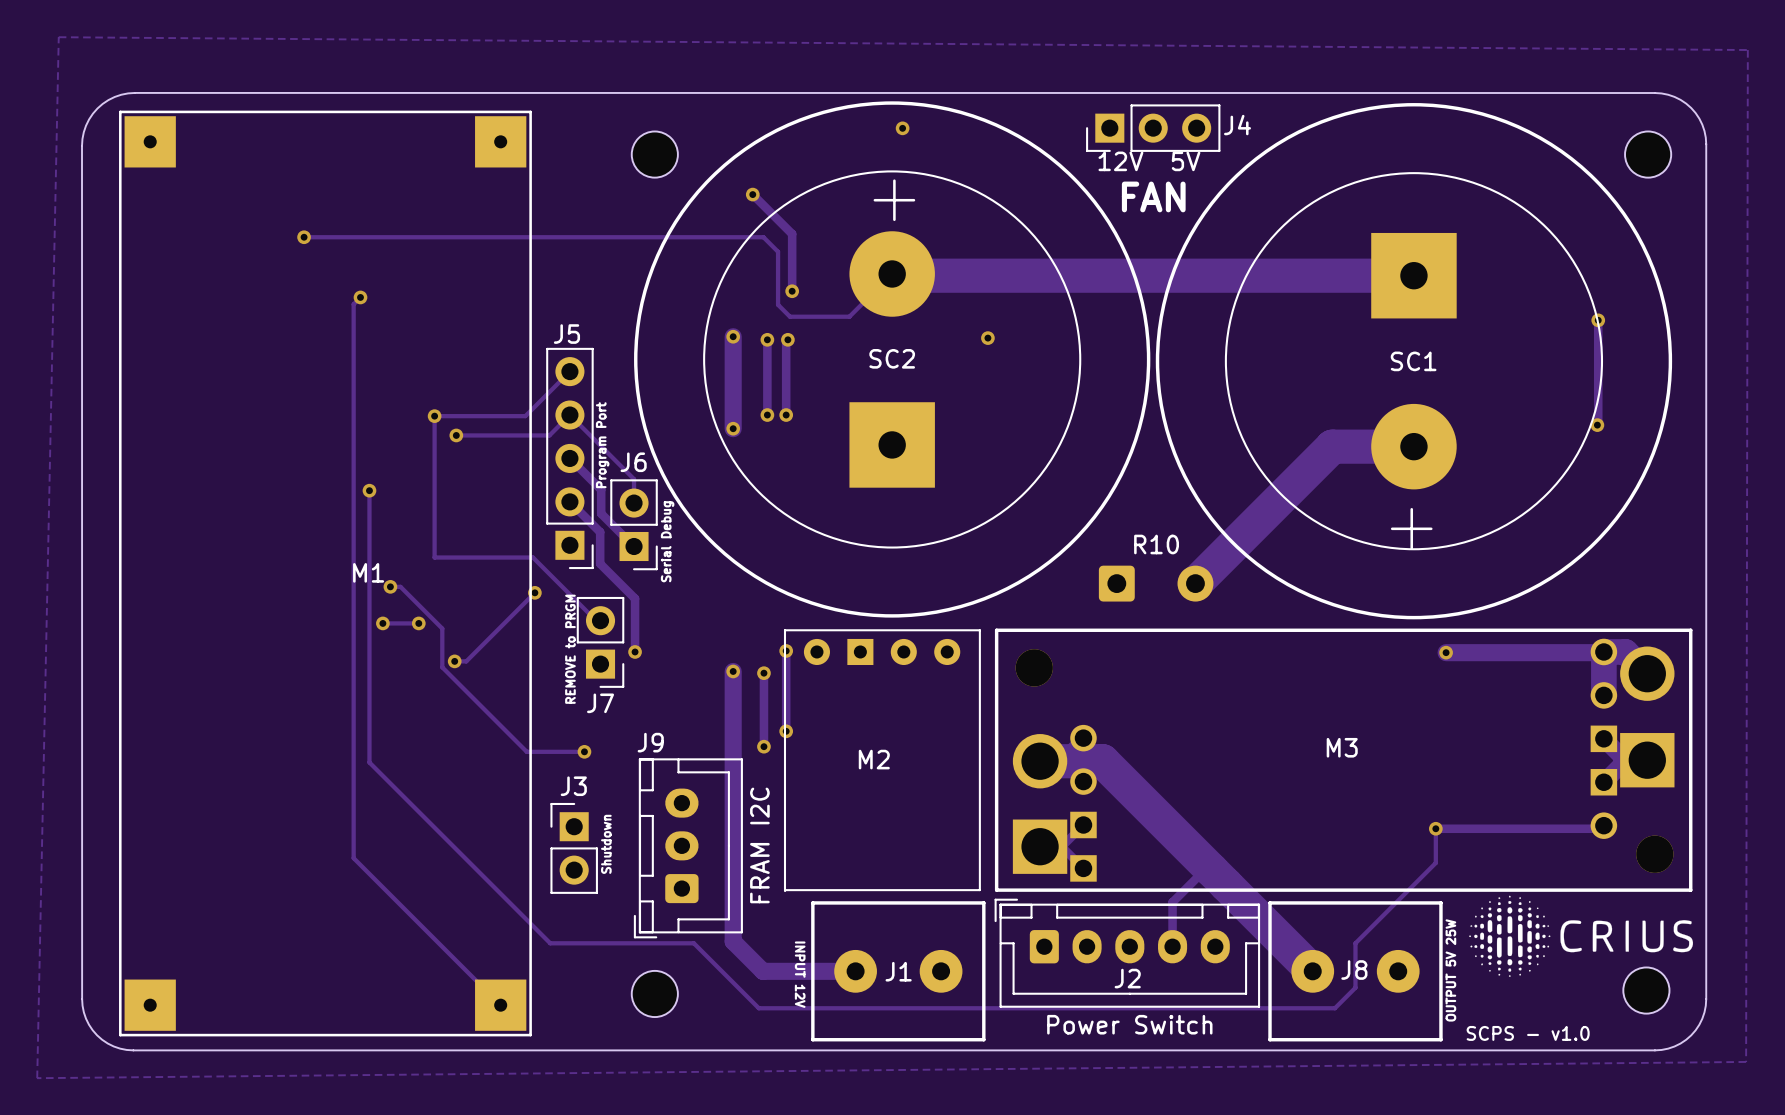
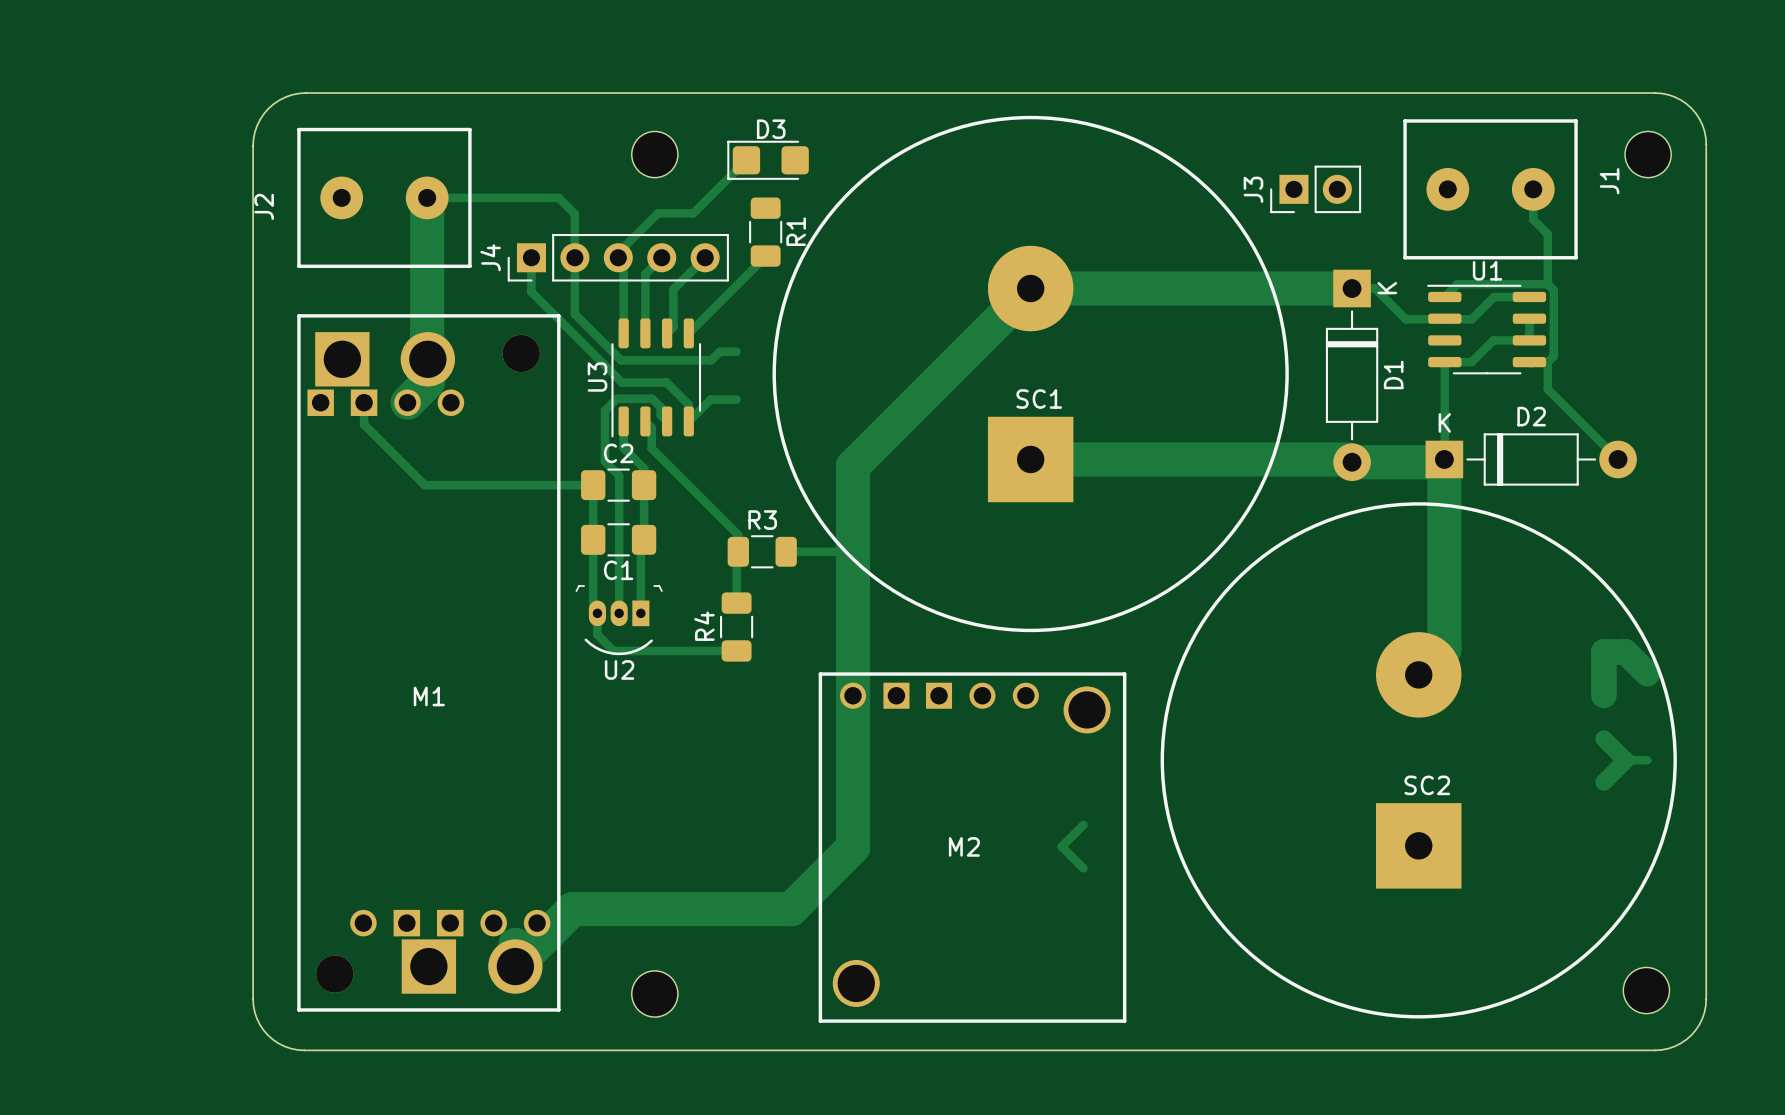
zone outline: (58, 37) (37, 1078) (1746, 1061) (1747, 50) (58, 37) -> none
board edge: (306, 93) (135, 92) (121, 94) (102, 103) (92, 113) (83, 132) (82, 145) (82, 999) (83, 1012) (92, 1030) (102, 1039) (113, 1046) (126, 1049) (304, 1050) -> (306, 93) (285, 97) (268, 108) (257, 125) (253, 146) (253, 999) (256, 1018) (268, 1035) (284, 1046) (304, 1050)
SC2 footprint: [634, 101, 1151, 618] -> [1160, 502, 1677, 1019]
SC1 footprint: [1155, 103, 1673, 620] -> [772, 115, 1289, 633]
J4 footprint: [1086, 104, 1221, 152] -> [507, 233, 729, 282]
M1 footprint: [119, 110, 532, 1037] -> [297, 314, 561, 1012]
J4 name position: J4 (1237, 125) -> J4 (490, 257)
via: (902, 128) -> none
track: none -> (746, 160) (693, 213) (657, 213) (618, 252) (618, 257) (623, 263) (623, 333)
D3: none -> (768, 160)
J4 value: 12V 5V (1149, 161) -> none
track: none -> (1533, 189) (1533, 219) (1547, 234) (1547, 284)
track: (752, 194) (792, 233) (792, 291) -> none
via: (752, 194) -> none
text: FAN (1153, 196) -> none
R1: none -> (765, 232)
track: (304, 237) (763, 237) (778, 251) (778, 304) (790, 316) (849, 316) (892, 273) (893, 275) (1413, 275) -> none
via: (304, 237) -> none
track: none -> (765, 256) (688, 333)
track: none -> (531, 257) (531, 291) (622, 382) (666, 382) (688, 404) (688, 421) (710, 399) (736, 399)
track: none -> (661, 257) (645, 274) (645, 333)
track: none -> (705, 257) (673, 289) (673, 327) (667, 333)
track: none -> (1547, 284) (1553, 290) (1553, 356) (1547, 362)
track: none -> (1547, 284) (1457, 284) (1444, 296)
via: (792, 291) -> none
track: none -> (1529, 296) (1494, 296) (1471, 319) (1405, 319) (1375, 288) (1030, 288) (853, 466) (853, 847) (791, 909) (572, 909) (515, 966) (515, 944)
track: (360, 297) (353, 304) (353, 858) (500, 1005) -> none
via: (360, 297) -> none
track: none -> (1529, 318) (1529, 340) (1493, 340) (1471, 362) (1444, 362) (1444, 459)
track: (1598, 320) (1597, 425) -> none
via: (1598, 320) -> none
U1: none -> (1486, 329)
track: (733, 336) (733, 428) -> none
via: (733, 336) -> none
via: (987, 338) -> none
track: (767, 339) (767, 415) -> none
via: (767, 339) -> none
track: (787, 339) (786, 341) (786, 415) -> none
via: (787, 339) -> none
track: none -> (736, 351) (719, 351) (711, 360) (621, 360) (574, 314) (574, 213) (558, 197) (427, 197) (427, 382) (407, 402)
track: none -> (1547, 362) (1547, 389) (1618, 459)
track: (569, 371) (525, 416) (434, 416) (434, 557) (532, 557) (596, 620) (600, 620) -> none
D1: none -> (1352, 375)
U3: none -> (656, 377)
track: none -> (364, 402) (364, 424) (424, 485) (593, 485) (593, 609) (597, 613) (597, 634) (613, 650) (736, 650)
via: (767, 415) -> none
via: (786, 415) -> none
via: (434, 416) -> none
track: none -> (623, 421) (623, 448) (644, 468) (644, 539) (640, 543) (640, 613)
track: none -> (645, 421) (651, 427) (651, 448) (738, 535) (736, 603)
track: none -> (667, 421) (660, 415) (660, 407) (652, 398) (616, 398) (604, 410) (604, 461) (619, 475) (619, 613)
via: (1597, 425) -> none
via: (733, 428) -> none
track: (456, 435) (549, 435) (569, 415) (634, 479) (634, 503) -> none
via: (456, 435) -> none
text: Program Port (602, 445) -> none
track: (1413, 446) (1332, 446) (1195, 583) -> none
track: (569, 458) (601, 489) (601, 513) (634, 546) -> none
J5: (569, 458) -> none
track: none -> (1030, 459) (1349, 459) (1352, 462) (1441, 462) (1444, 459)
track: none -> (1444, 459) (1444, 649) (1418, 674)
D2: none -> (1531, 459)
C2: none -> (618, 485)
track: (369, 490) (369, 762) (550, 943) (693, 943) (758, 1008) (1334, 1008) (1355, 987) (1355, 943) (1435, 862) (1435, 828) (1600, 828) (1603, 825) -> none
via: (369, 490) -> none
track: (569, 501) (600, 532) (600, 563) (635, 598) (635, 651) -> none
J6: Serial Debug (634, 524) -> none
C1: none -> (618, 539)
R3: none -> (762, 551)
track: none -> (786, 551) (853, 551)
M1 name position: M1 (368, 572) -> M1 (429, 696)
R10: (1156, 583) -> none
track: (390, 586) (400, 586) (442, 628) (442, 667) (526, 751) (584, 751) -> none
via: (390, 586) -> none
track: (534, 592) (466, 661) (454, 661) -> none
via: (534, 592) -> none
U2: none -> (619, 620)
track: (382, 623) (418, 623) -> none
via: (382, 623) -> none
via: (418, 623) -> none
R4: none -> (736, 627)
M2 footprint: [783, 629, 981, 893] -> [818, 672, 1127, 1023]
J7: REMOVE to PRGM (600, 642) -> none
track: (786, 650) (786, 731) -> none
via: (786, 650) -> none
via: (635, 651) -> none
track: (1603, 651) (1446, 652) -> none
via: (1446, 652) -> none
via: (454, 661) -> none
track: (733, 671) (733, 941) (762, 971) (855, 971) -> none
via: (733, 671) -> none
track: (763, 673) (763, 746) -> none
via: (763, 673) -> none
via: (786, 731) -> none
via: (763, 746) -> none
via: (584, 751) -> none
M3: (1343, 760) -> none
track: (1083, 781) (1063, 761) (1040, 761) (1102, 761) (1312, 971) -> none
via: (1435, 828) -> none
J3 value: Shutdown (606, 844) -> none
J3 rotation: 0° (574, 848) -> 90° counterclockwise (1315, 189)
J3 position: (574, 848) -> (1315, 189)
J9: FRAM I2C (688, 848) -> none
track: (1211, 870) (1204, 870) (1172, 902) (1172, 946) -> none
drawing: [1469, 895, 1694, 977] -> none
J2 footprint: [994, 898, 1261, 1008] -> [297, 127, 472, 269]
text: OUTPUT 5V 25W (1450, 970) -> none
J1 position: (898, 971) -> (1490, 189)
J1 name rotation: 0° (898, 971) -> 90° counterclockwise (1609, 181)
J1 name position: J1 (898, 971) -> J1 (1609, 181)
J8: (1355, 971) -> none
text: INPUT 12V (800, 974) -> none
J2 name position: J2 (1127, 978) -> J2 (264, 206)
J2 value: Power Switch (1129, 1024) -> none
text: SCPS - v1.0 (1528, 1033) -> none

